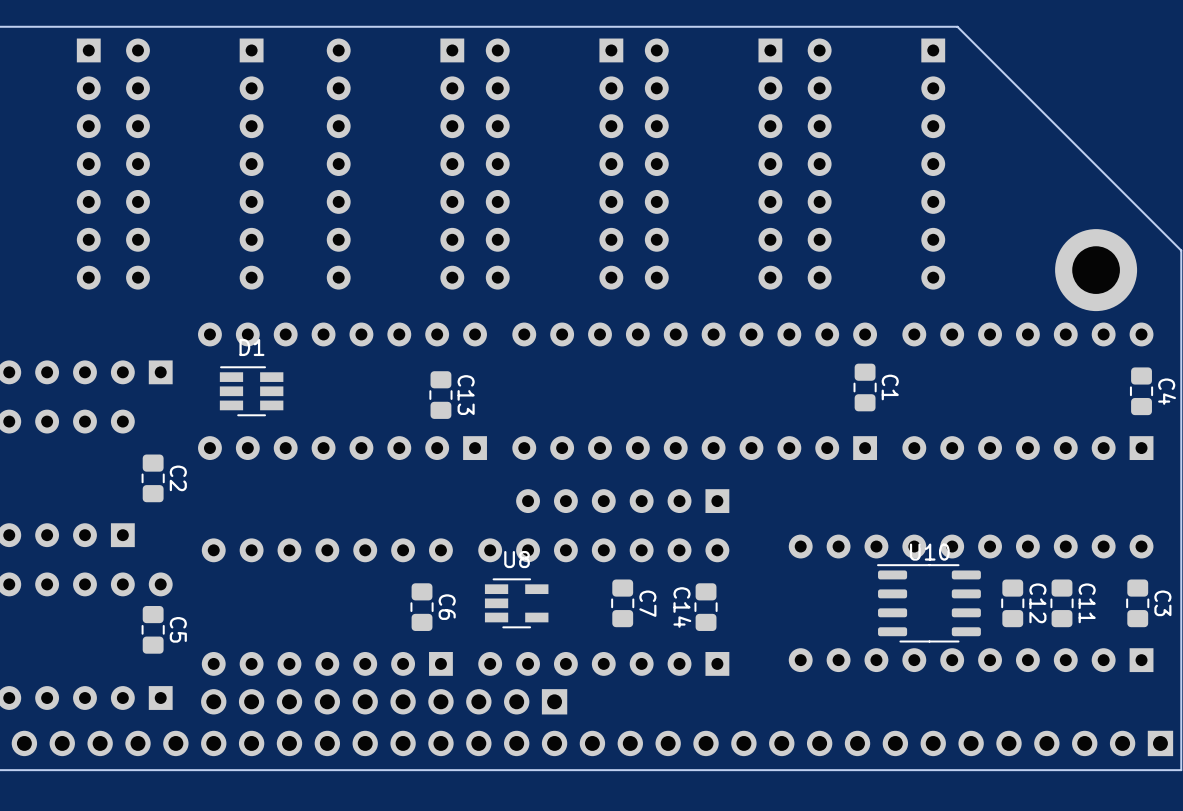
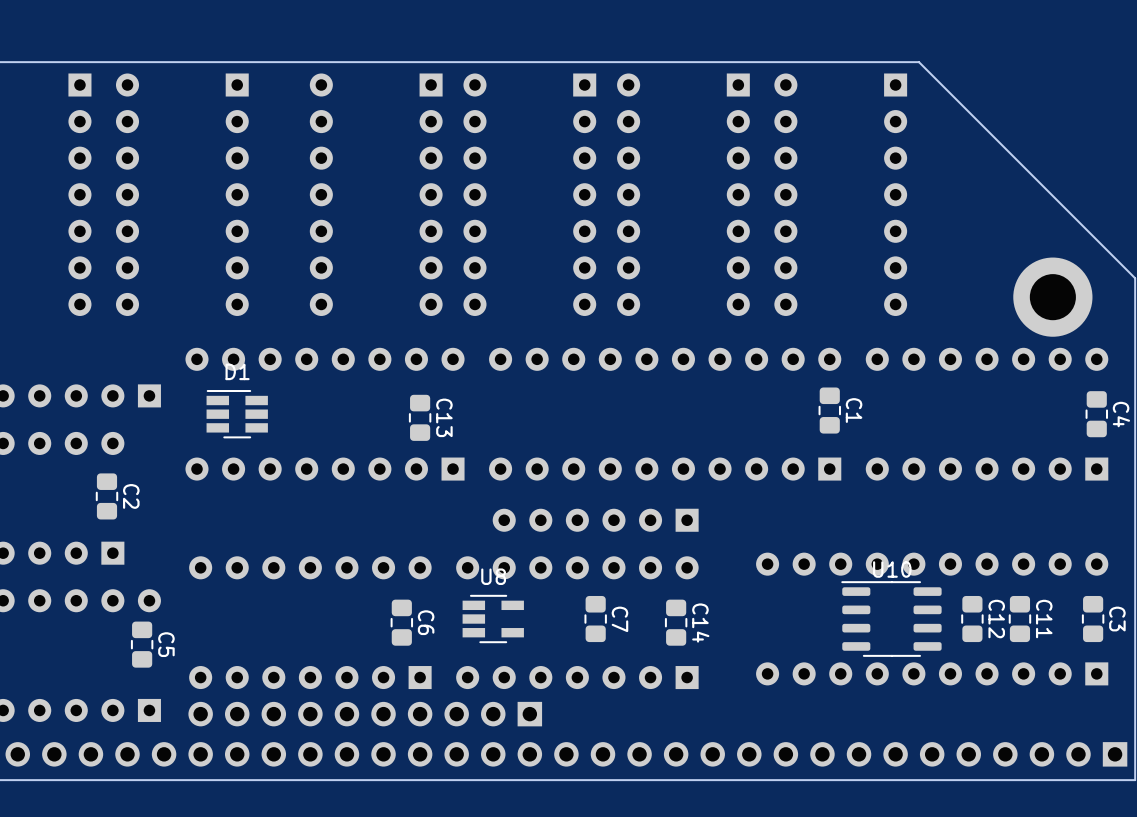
C2 position: (153, 478) -> (106, 496)
C14 name position: C14 (682, 607) -> C14 (700, 623)

